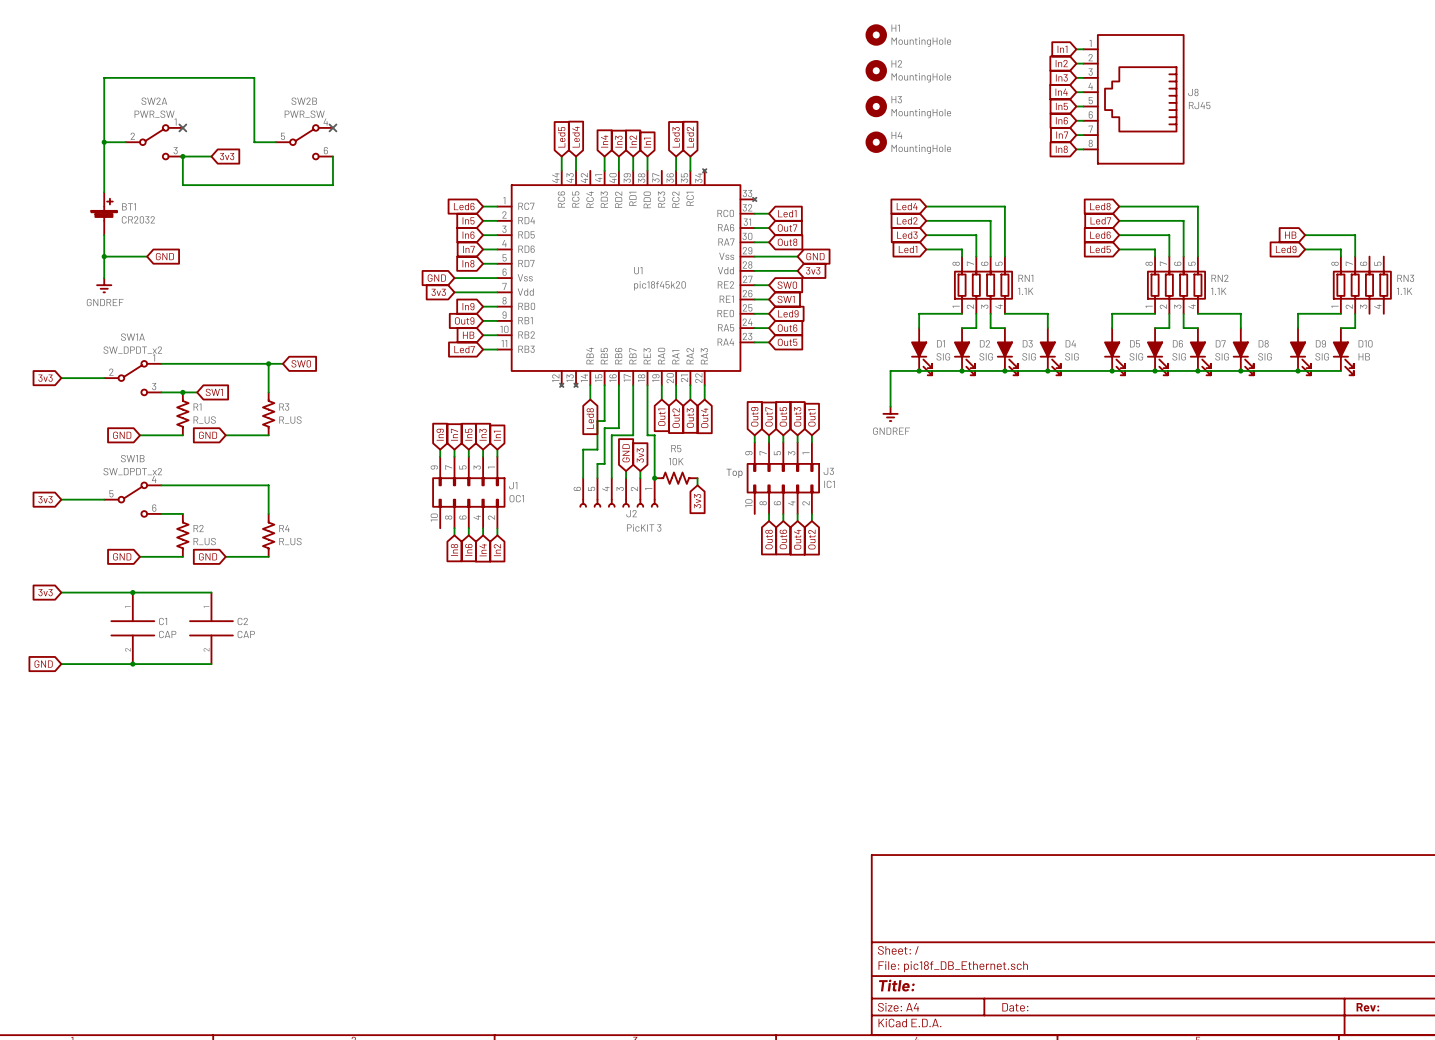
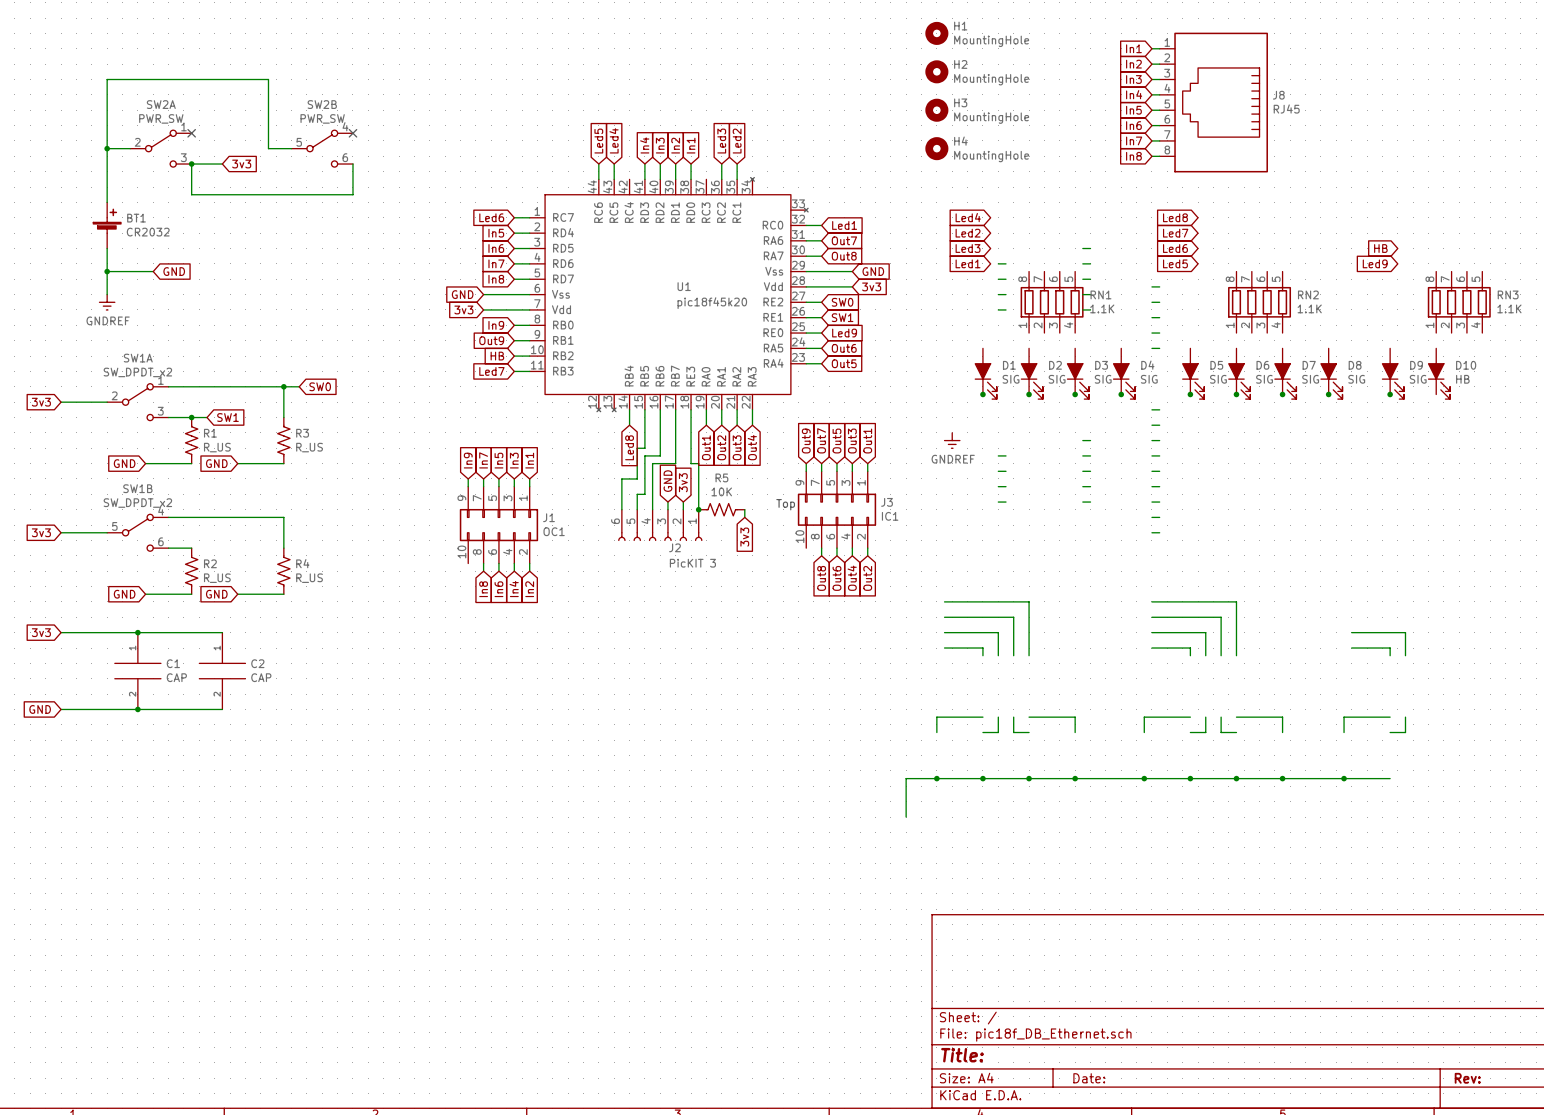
wire: (926, 206) (1004, 206) (1004, 256) -> none
wire: (1119, 206) (1197, 206) (1197, 256) -> none
wire: (926, 220) (990, 220) (990, 256) -> none
wire: (1119, 220) (1183, 220) (1183, 256) -> none
wire: (926, 235) (976, 235) (976, 256) -> none
wire: none -> (1082, 248) (1090, 248)
wire: (1119, 235) (1169, 235) (1169, 256) -> none
wire: (1305, 235) (1355, 235) (1355, 256) -> none
wire: (926, 249) (933, 249) -> (998, 279) (1006, 279)
wire: (940, 249) (962, 249) (962, 256) -> none
wire: none -> (1082, 263) (1090, 263)
wire: (1119, 249) (1155, 249) (1155, 256) -> none
wire: (1305, 249) (1340, 249) (1340, 256) -> none
wire: none -> (1082, 279) (1090, 279)
wire: none -> (1151, 286) (1159, 286)
wire: none -> (998, 294) (1006, 294)
wire: none -> (1082, 294) (1090, 294)
wire: none -> (1151, 302) (1159, 302)
wire: none -> (998, 309) (1006, 309)
wire: none -> (1082, 309) (1090, 309)
wire: none -> (1151, 317) (1159, 317)
wire: (962, 313) (919, 313) (919, 328) -> none
wire: (976, 313) (976, 328) (962, 328) -> none
wire: (990, 313) (990, 328) (1004, 328) -> none
wire: (1004, 313) (1047, 313) (1047, 328) -> none
wire: none -> (1151, 333) (1159, 333)
wire: (1155, 313) (1112, 313) (1112, 328) -> none
wire: (1169, 313) (1169, 328) (1155, 328) -> none
wire: (1183, 313) (1183, 328) (1197, 328) -> none
wire: (1197, 313) (1240, 313) (1240, 328) -> none
wire: (1340, 313) (1298, 313) (1298, 328) -> none
wire: (1355, 313) (1355, 328) (1340, 328) -> none
wire: none -> (1151, 348) (1159, 348)
wire: (1340, 370) (890, 370) (890, 406) -> none
wire: none -> (1151, 409) (1159, 409)
wire: none -> (1151, 425) (1159, 425)
wire: none -> (1082, 440) (1090, 440)
wire: none -> (1151, 440) (1159, 440)
wire: none -> (998, 455) (1006, 455)
wire: none -> (1082, 455) (1090, 455)
wire: none -> (1151, 455) (1159, 455)
wire: none -> (998, 471) (1006, 471)
wire: none -> (1082, 471) (1090, 471)
wire: none -> (1151, 471) (1159, 471)
wire: none -> (998, 486) (1006, 486)
wire: none -> (1082, 486) (1090, 486)
wire: none -> (1151, 486) (1159, 486)
wire: none -> (998, 502) (1006, 502)
wire: none -> (1082, 502) (1090, 502)
wire: none -> (1151, 502) (1159, 502)
wire: none -> (1151, 517) (1159, 517)
wire: none -> (1151, 532) (1159, 532)
wire: none -> (944, 601) (1029, 601) (1029, 655)
wire: none -> (1151, 601) (1236, 601) (1236, 655)
wire: none -> (944, 617) (1013, 617) (1013, 655)
wire: none -> (1151, 617) (1221, 617) (1221, 655)
wire: none -> (944, 632) (998, 632) (998, 655)
wire: none -> (1151, 632) (1205, 632) (1205, 655)
wire: none -> (1351, 632) (1405, 632) (1405, 655)
wire: none -> (944, 648) (982, 648) (982, 655)
wire: none -> (1151, 648) (1190, 648) (1190, 655)
wire: none -> (1351, 648) (1390, 648) (1390, 655)
wire: none -> (982, 717) (936, 717) (936, 732)
wire: none -> (998, 717) (998, 732) (982, 732)
wire: none -> (1013, 717) (1013, 732) (1029, 732)
wire: none -> (1029, 717) (1075, 717) (1075, 732)
wire: none -> (1190, 717) (1144, 717) (1144, 732)
wire: none -> (1205, 717) (1205, 732) (1190, 732)
wire: none -> (1221, 717) (1221, 732) (1236, 732)
wire: none -> (1236, 717) (1282, 717) (1282, 732)
wire: none -> (1390, 717) (1344, 717) (1344, 732)
wire: none -> (1405, 717) (1405, 732) (1390, 732)
junction: none -> (936, 778)
junction: none -> (982, 778)
junction: none -> (1029, 778)
junction: none -> (1075, 778)
junction: none -> (1144, 778)
junction: none -> (1190, 778)
junction: none -> (1236, 778)
junction: none -> (1282, 778)
junction: none -> (1344, 778)
wire: none -> (1390, 778) (906, 778) (906, 817)

